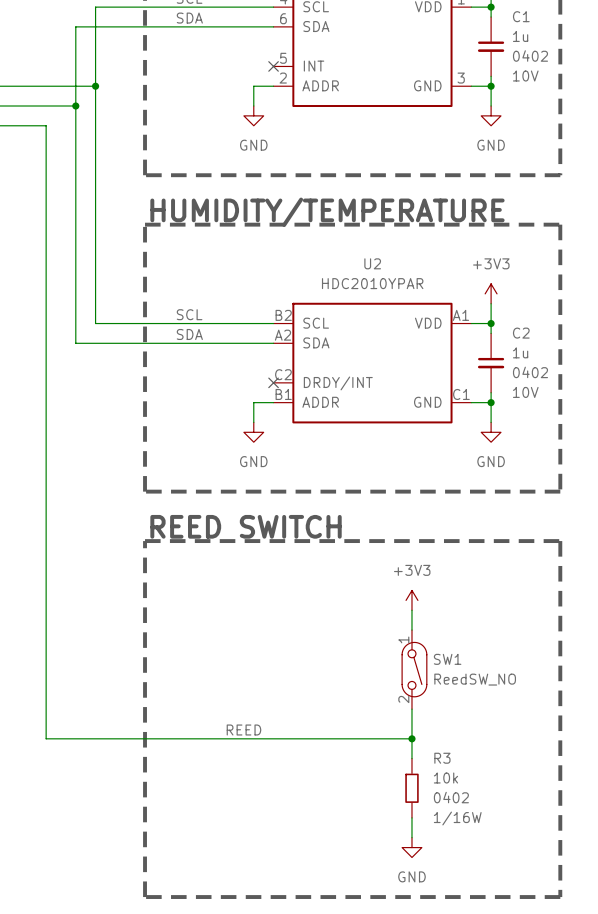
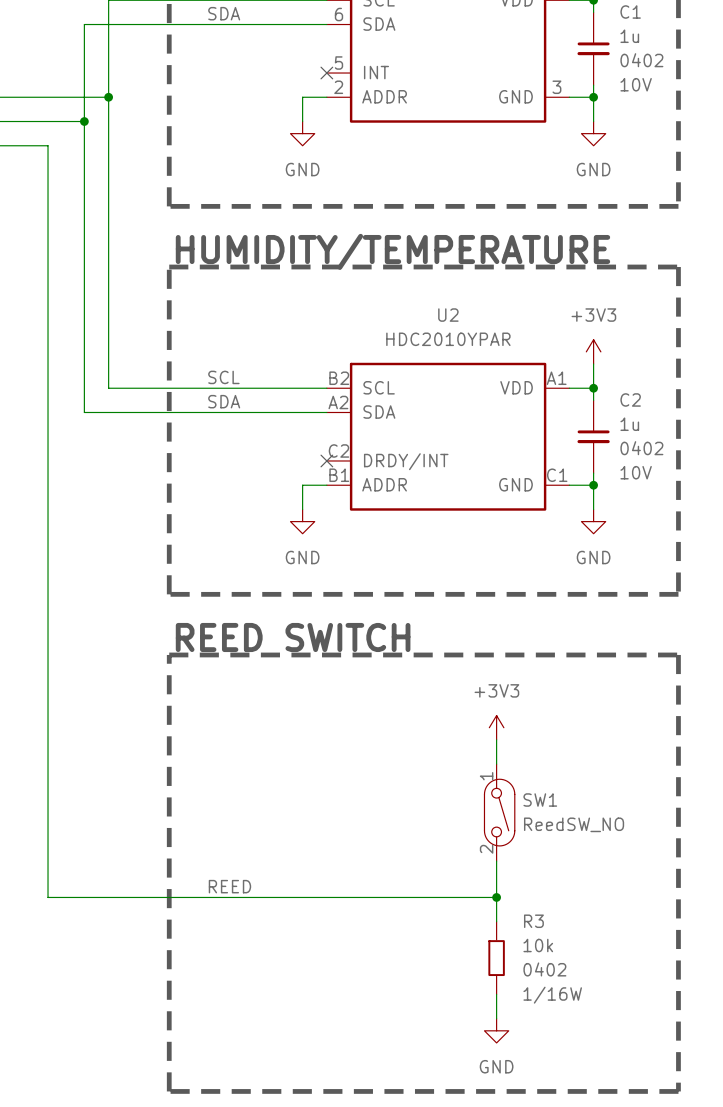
label position: REED (243, 730) -> REED (229, 886)

